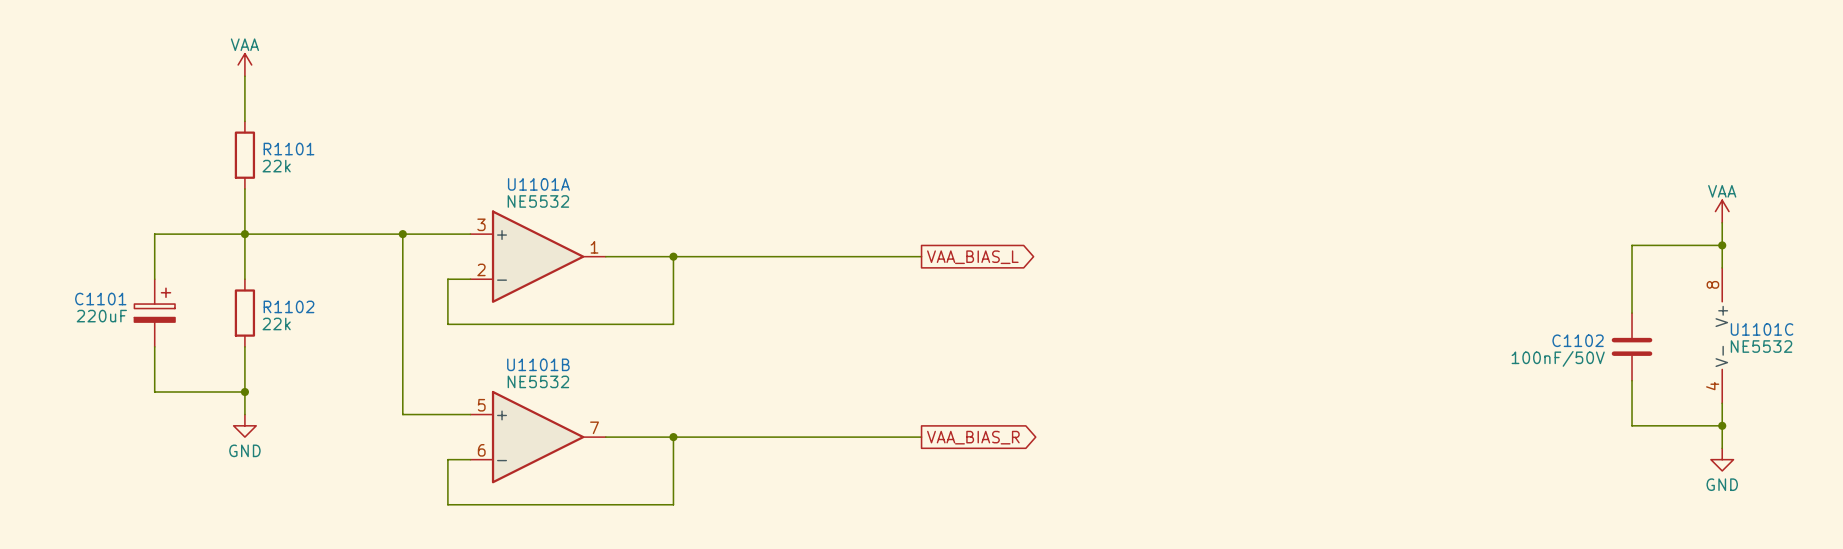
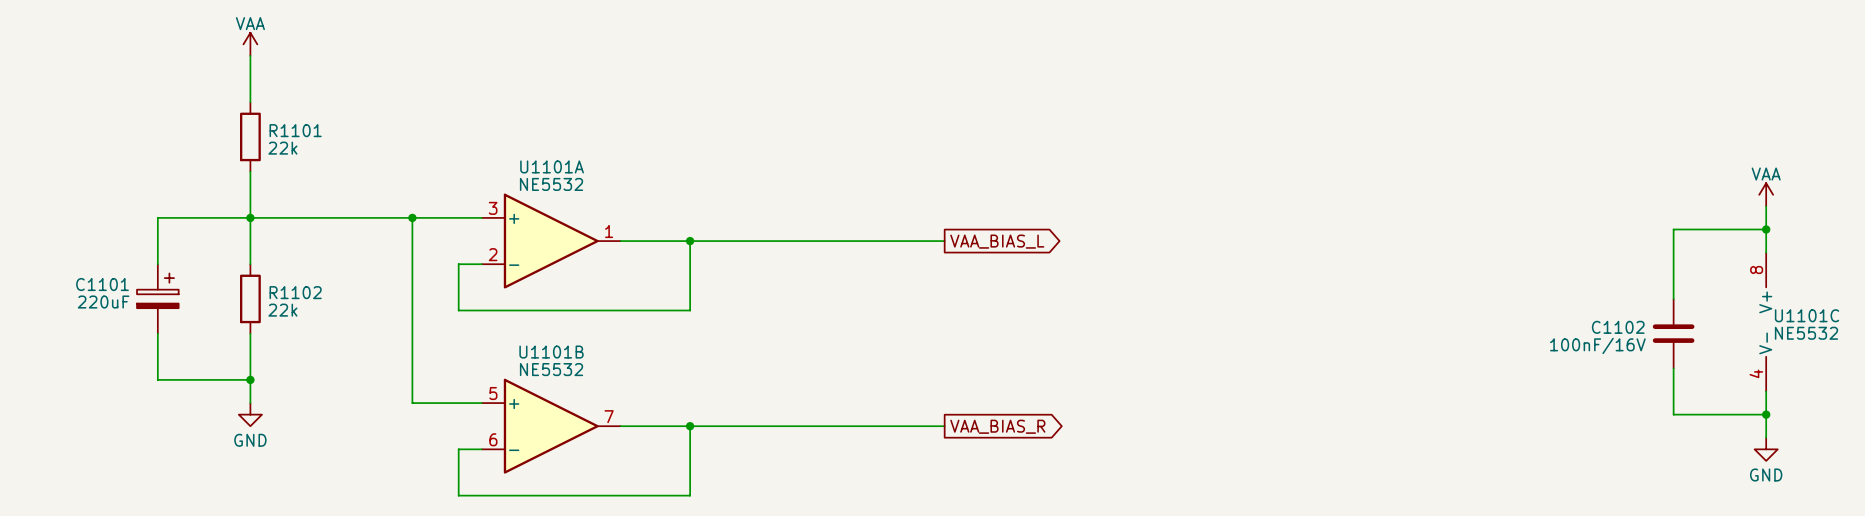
C1102 value: 100nF/50V (1558, 358) -> 100nF/16V (1597, 345)

